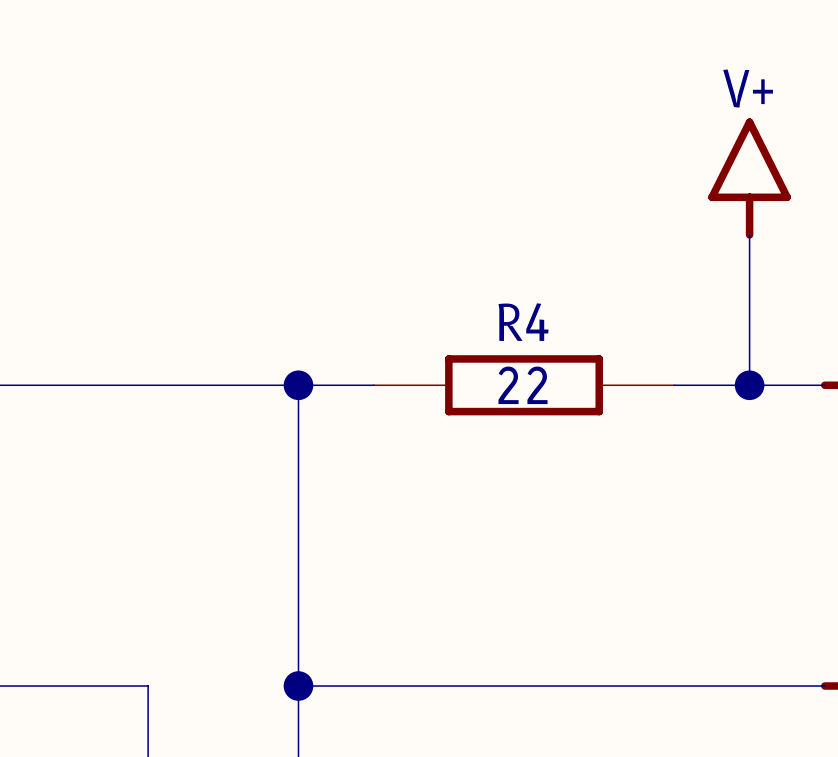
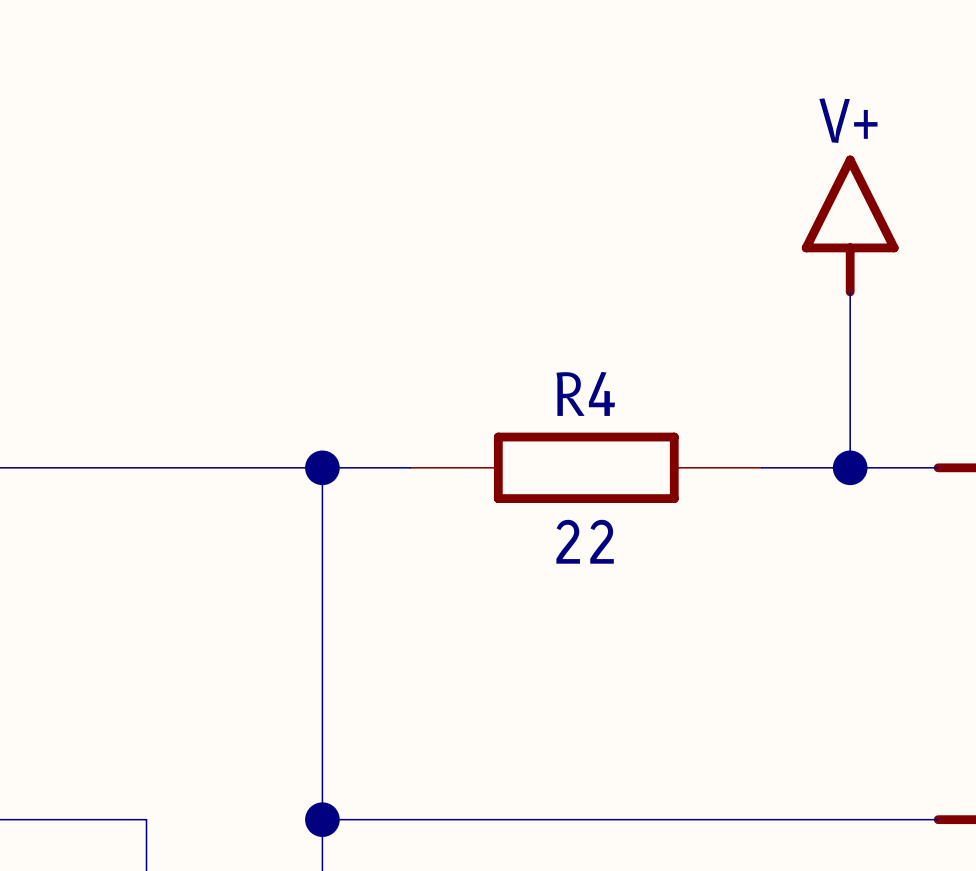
R4 value position: 22 (523, 385) -> 22 (585, 541)

